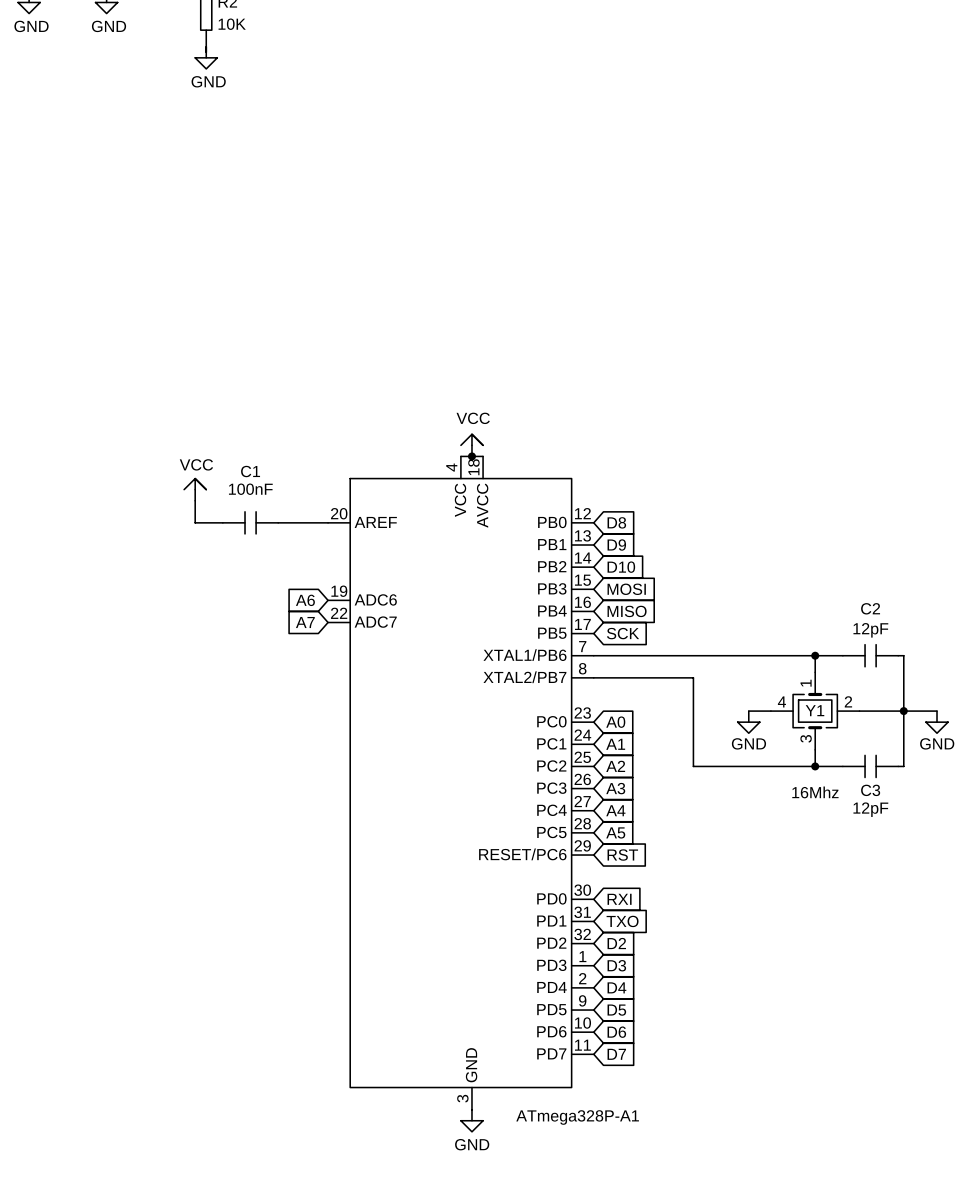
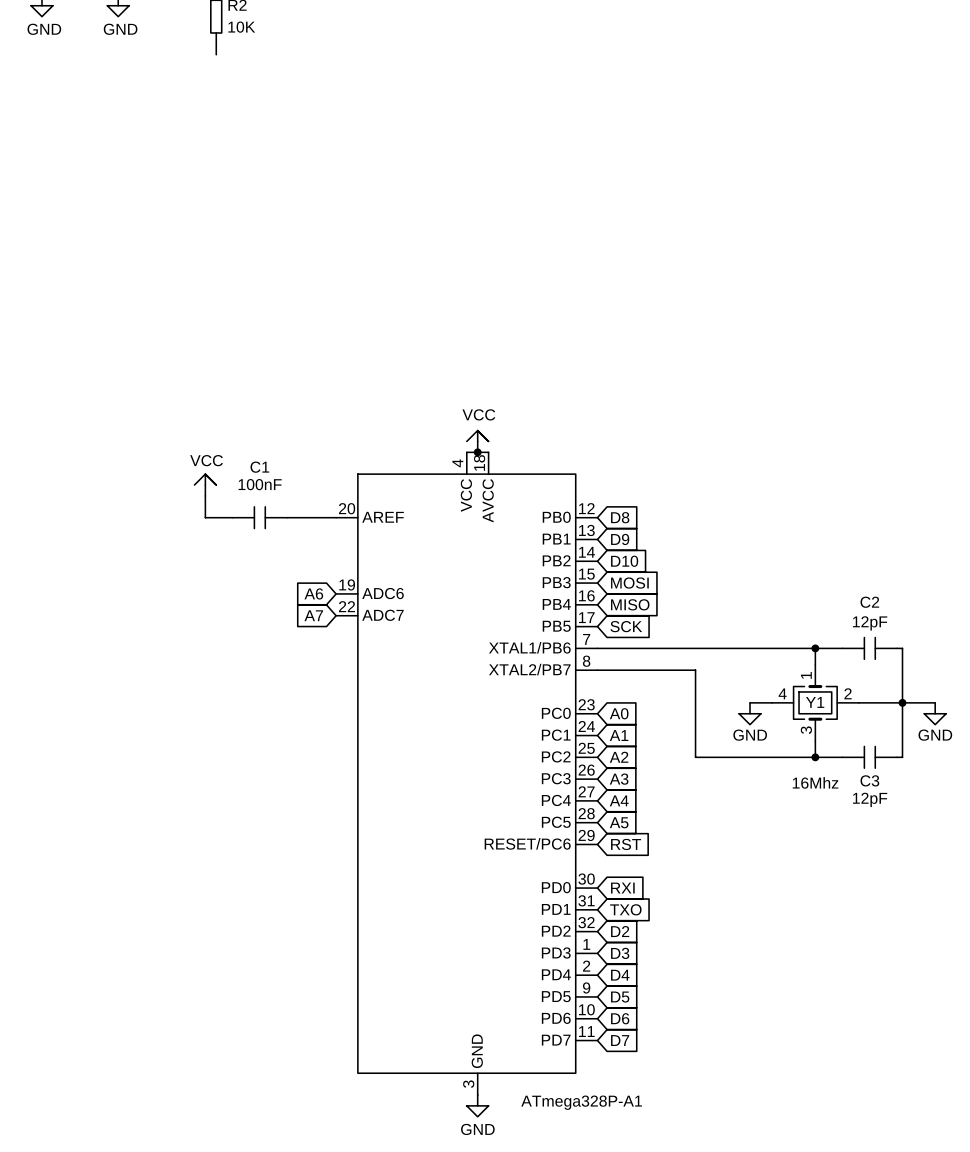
GND: (206, 57) -> none

